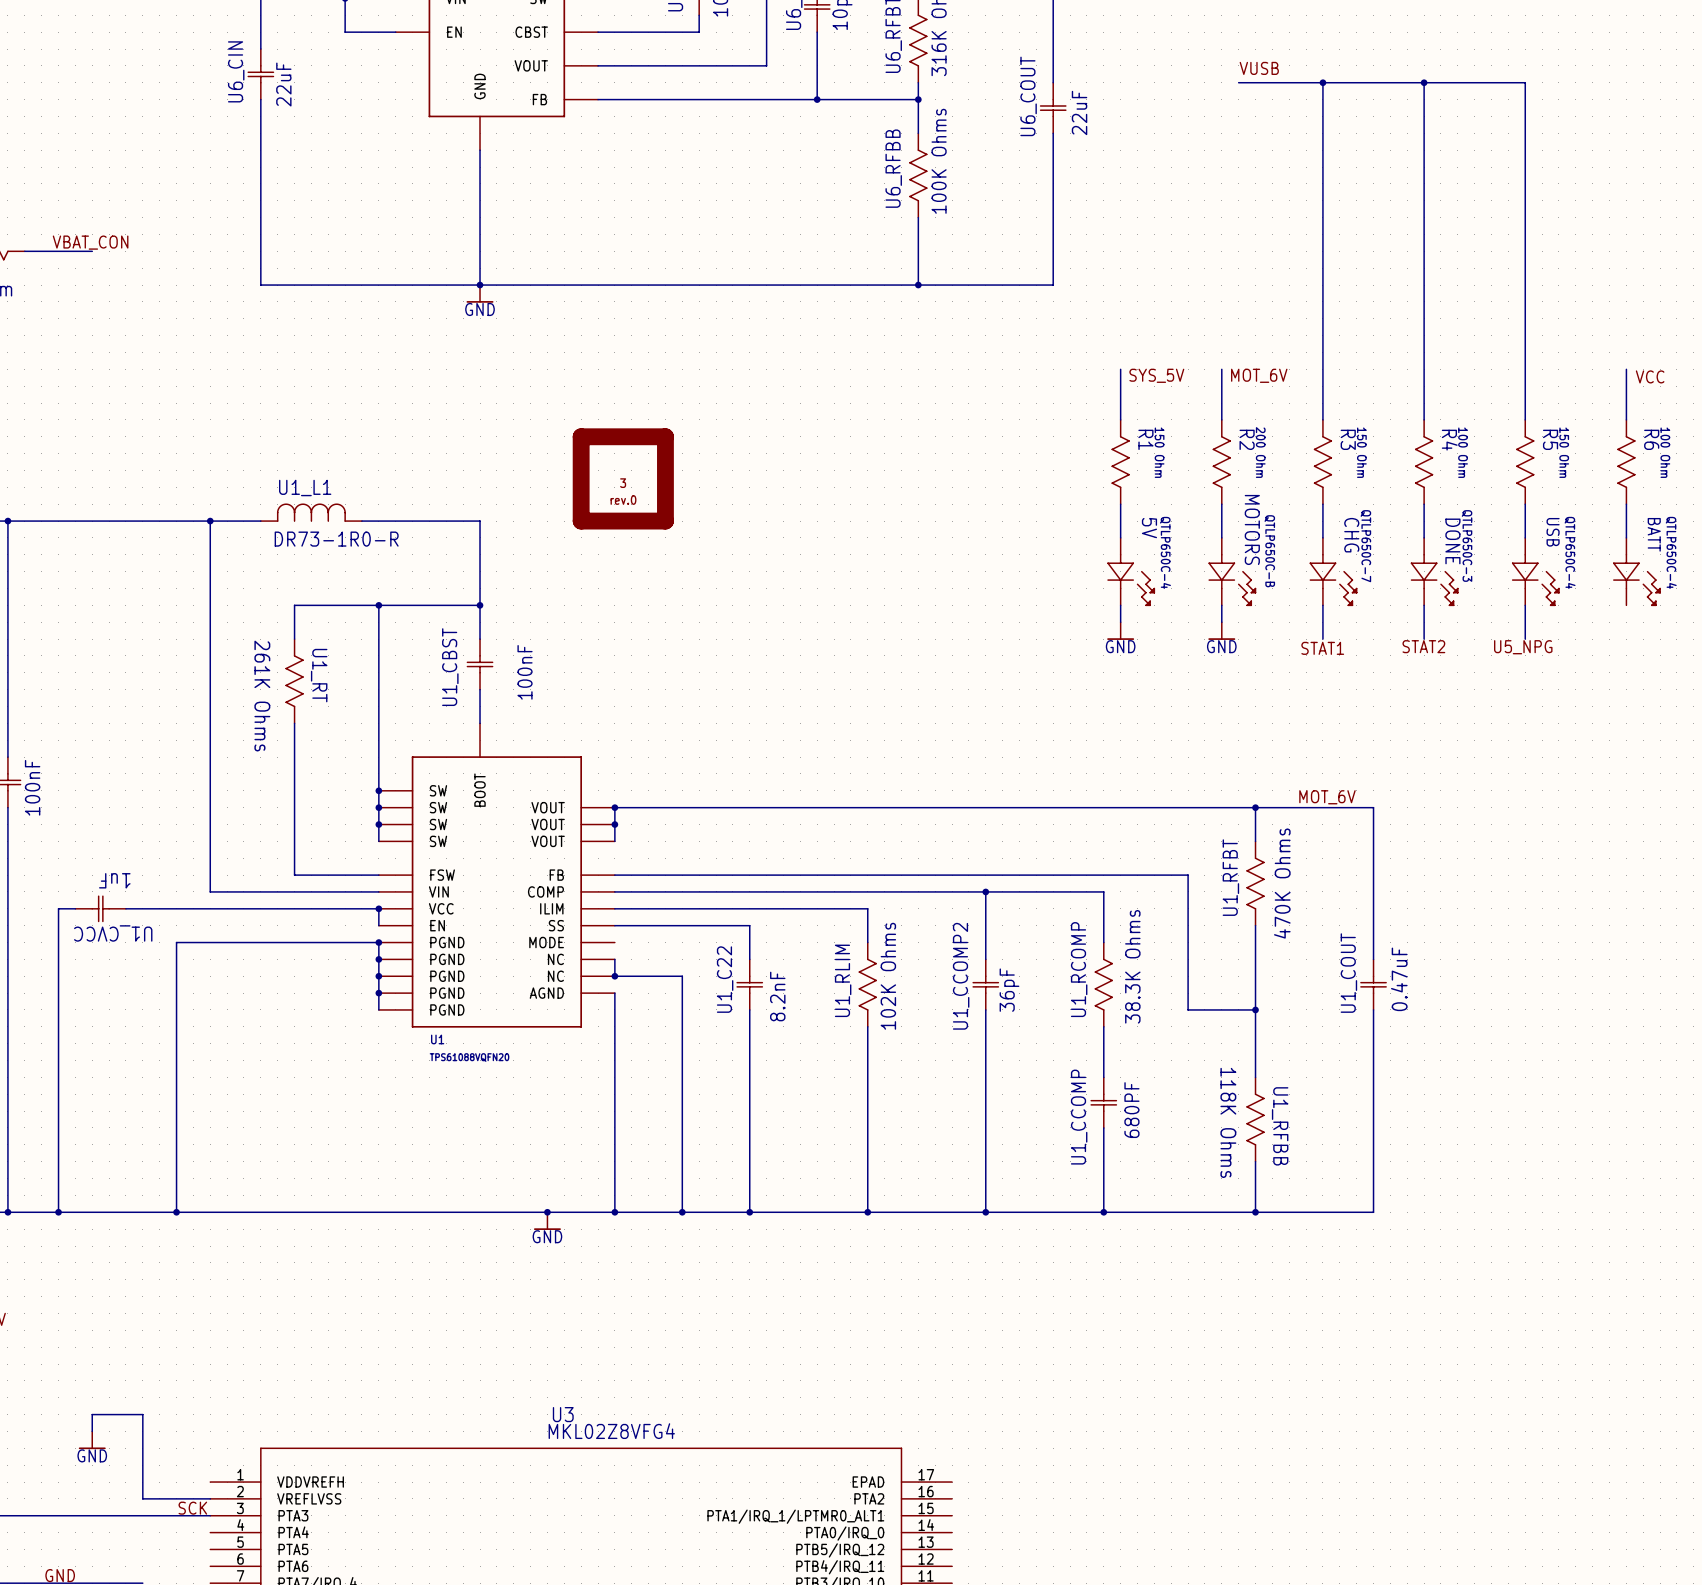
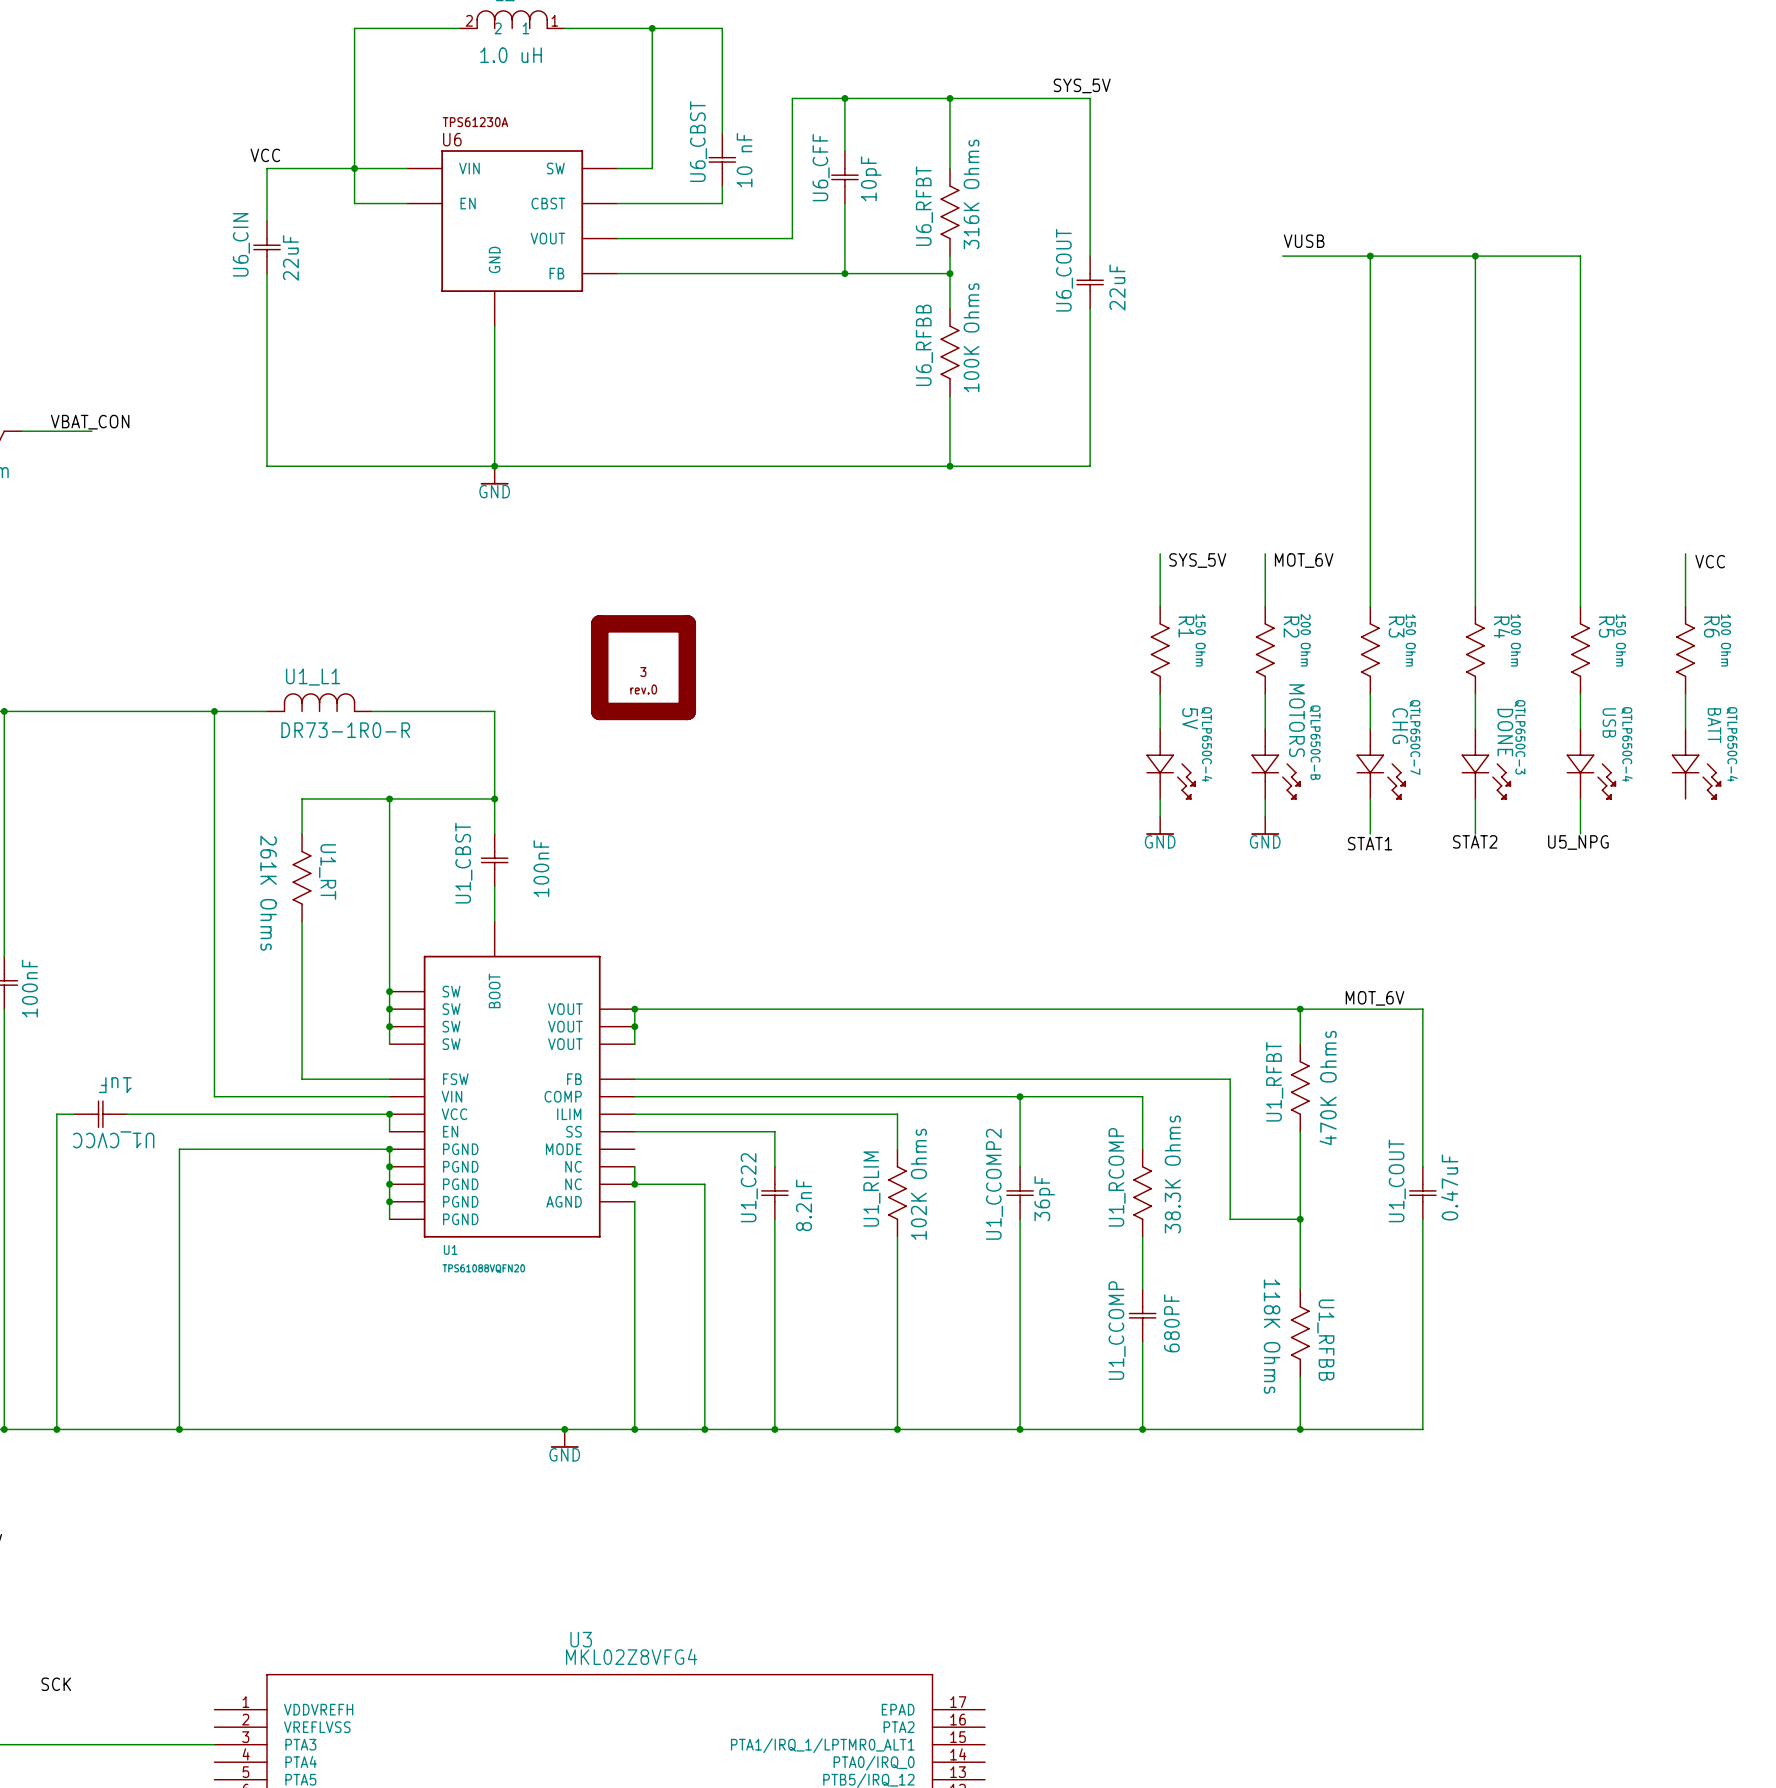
wire: (92, 1431) (92, 1414) (142, 1414) (142, 1498) (210, 1498) -> none
power symbol: GND (92, 1440) -> none
label position: SCK (192, 1508) -> SCK (56, 1684)

